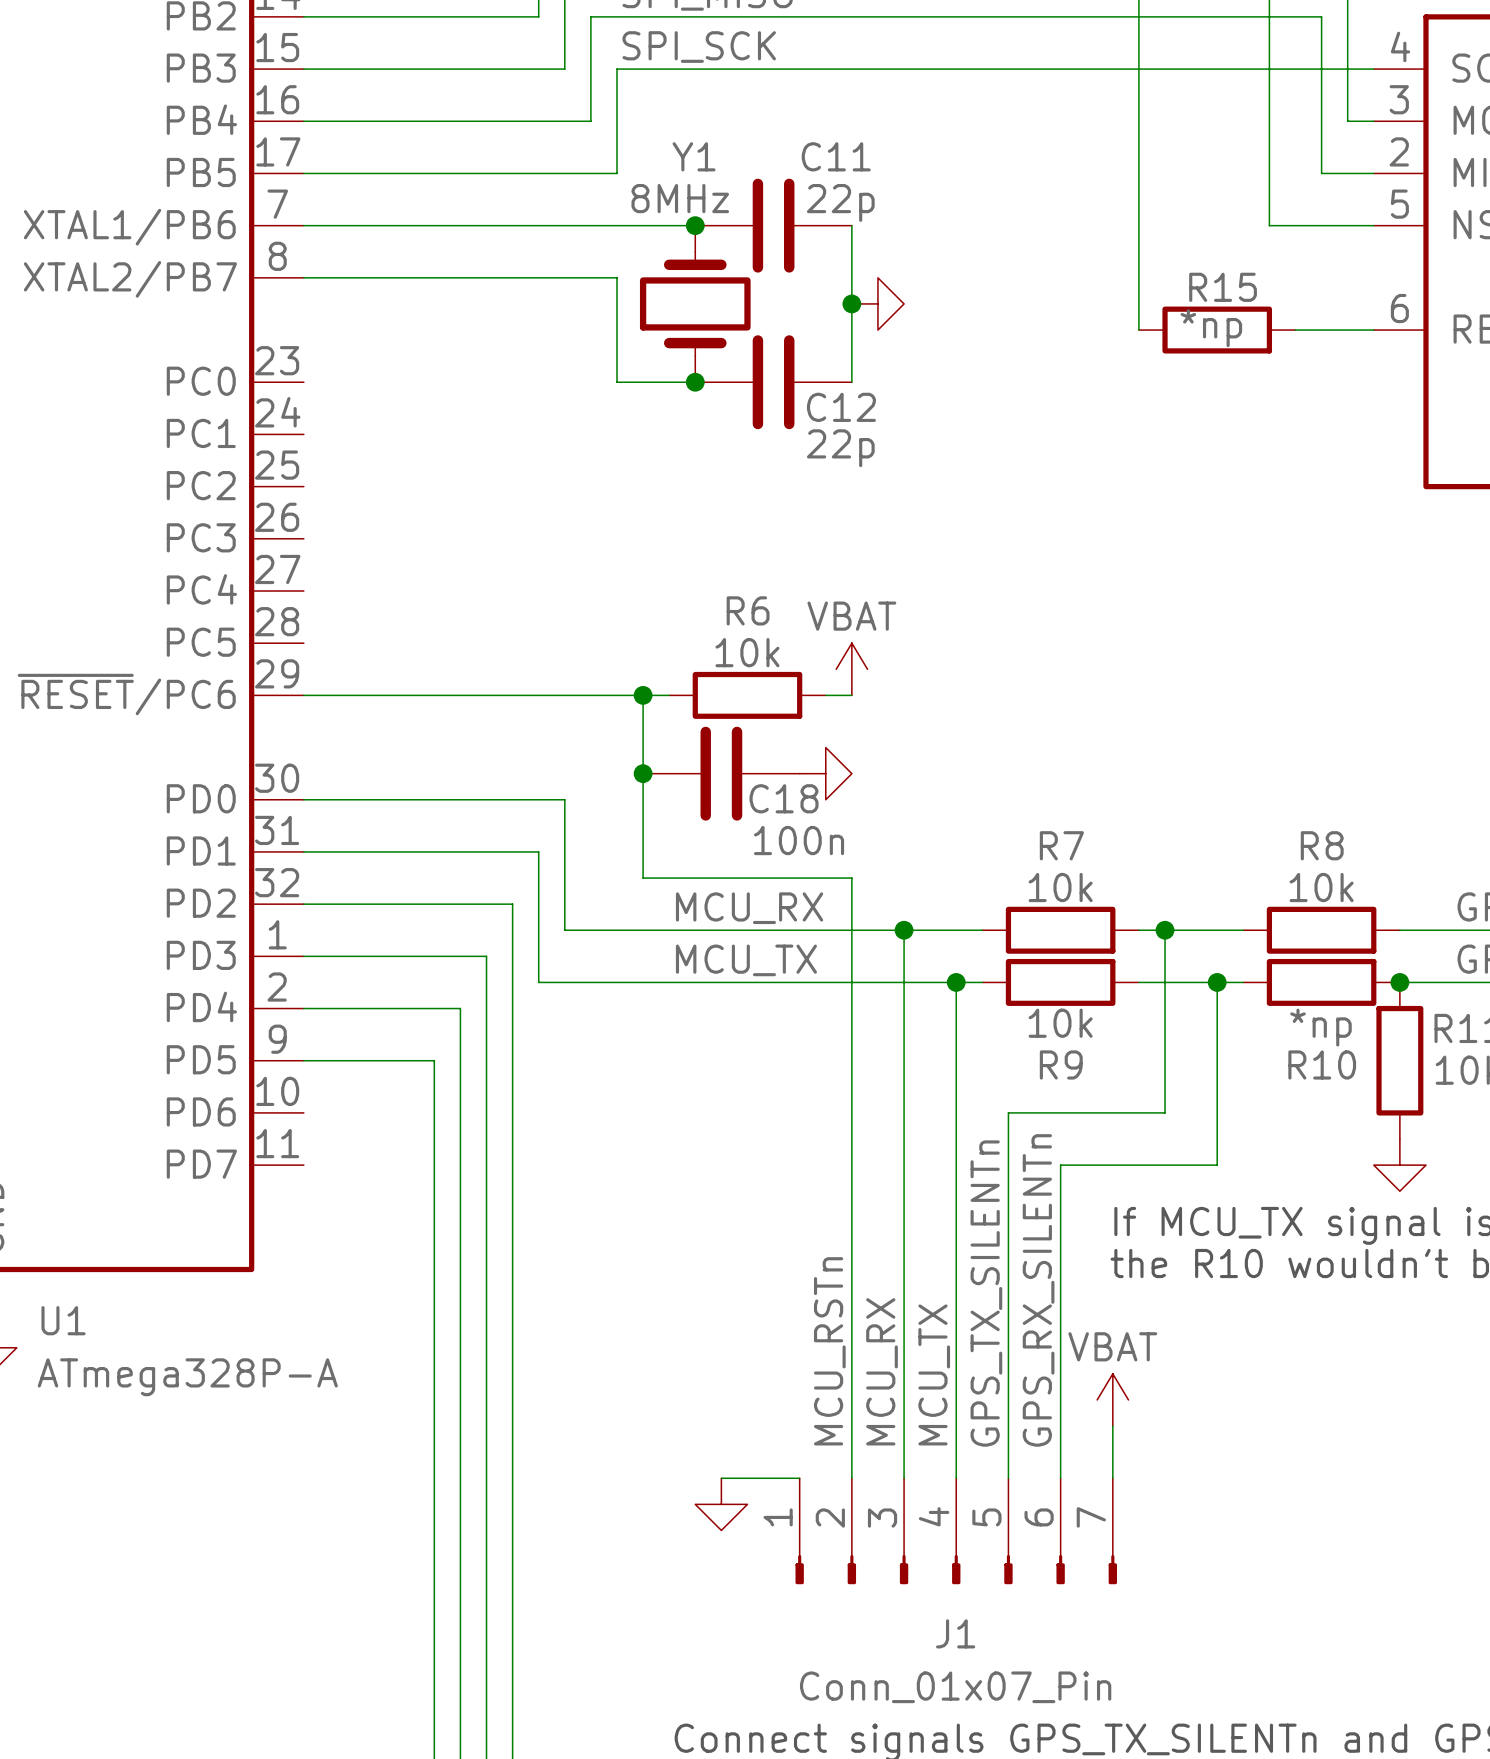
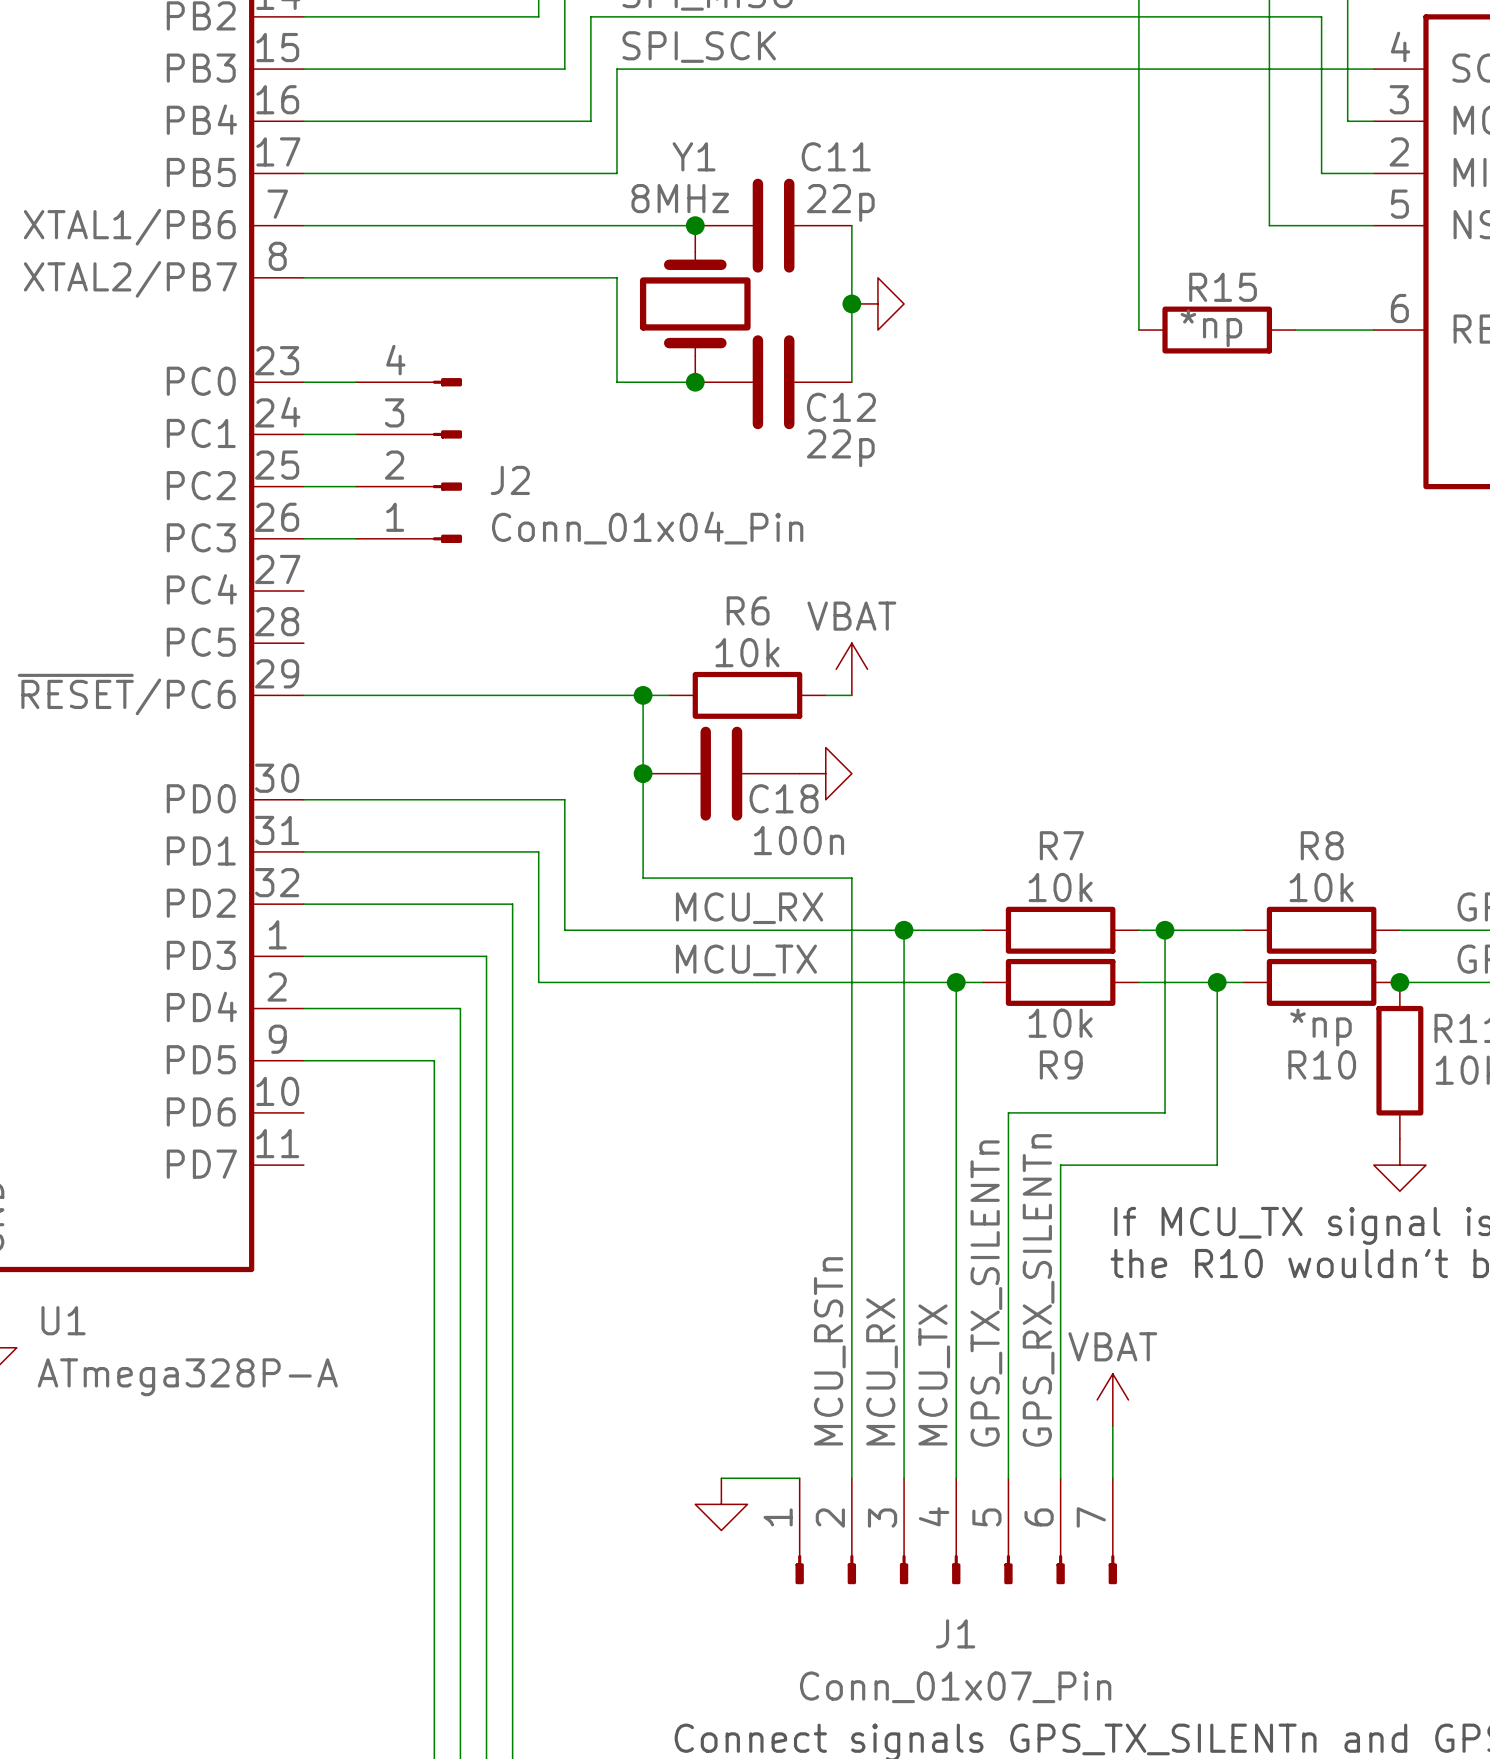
wire: none -> (303, 382) (356, 382)
wire: none -> (303, 434) (356, 434)
J2: none -> Conn_01x04_Pin (409, 460)
wire: none -> (303, 486) (356, 486)
wire: none -> (303, 538) (356, 538)

